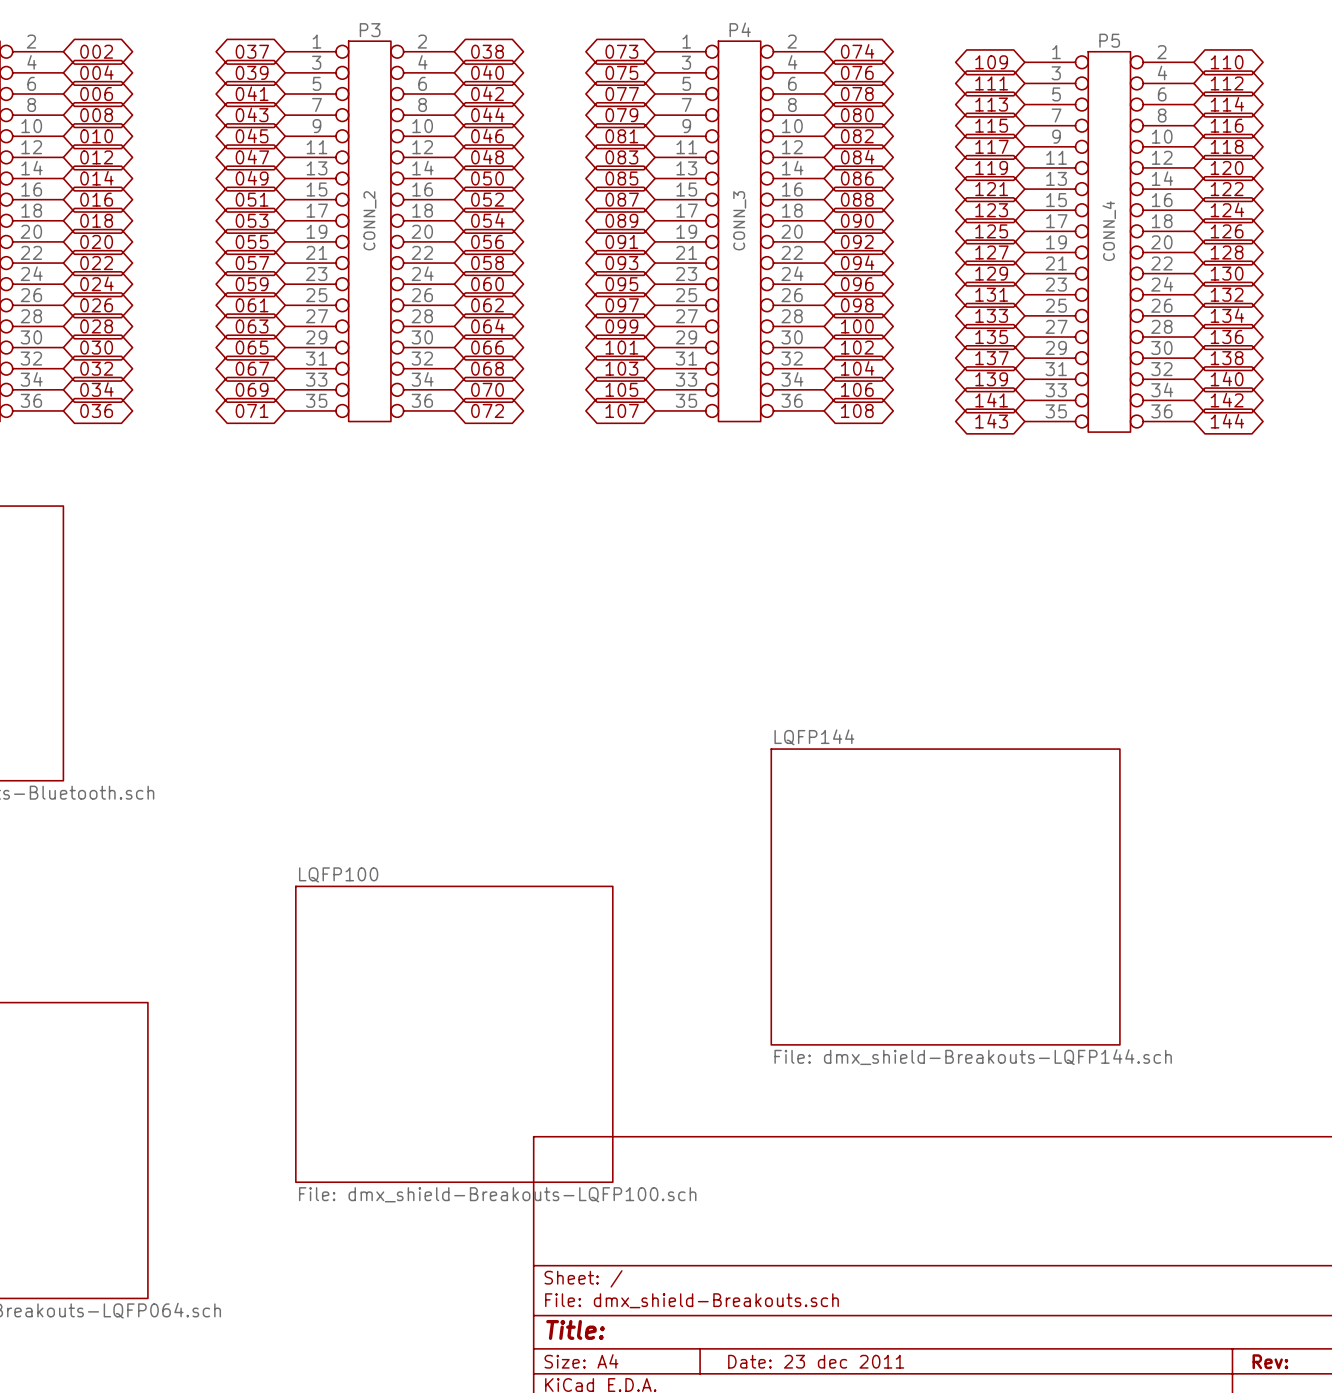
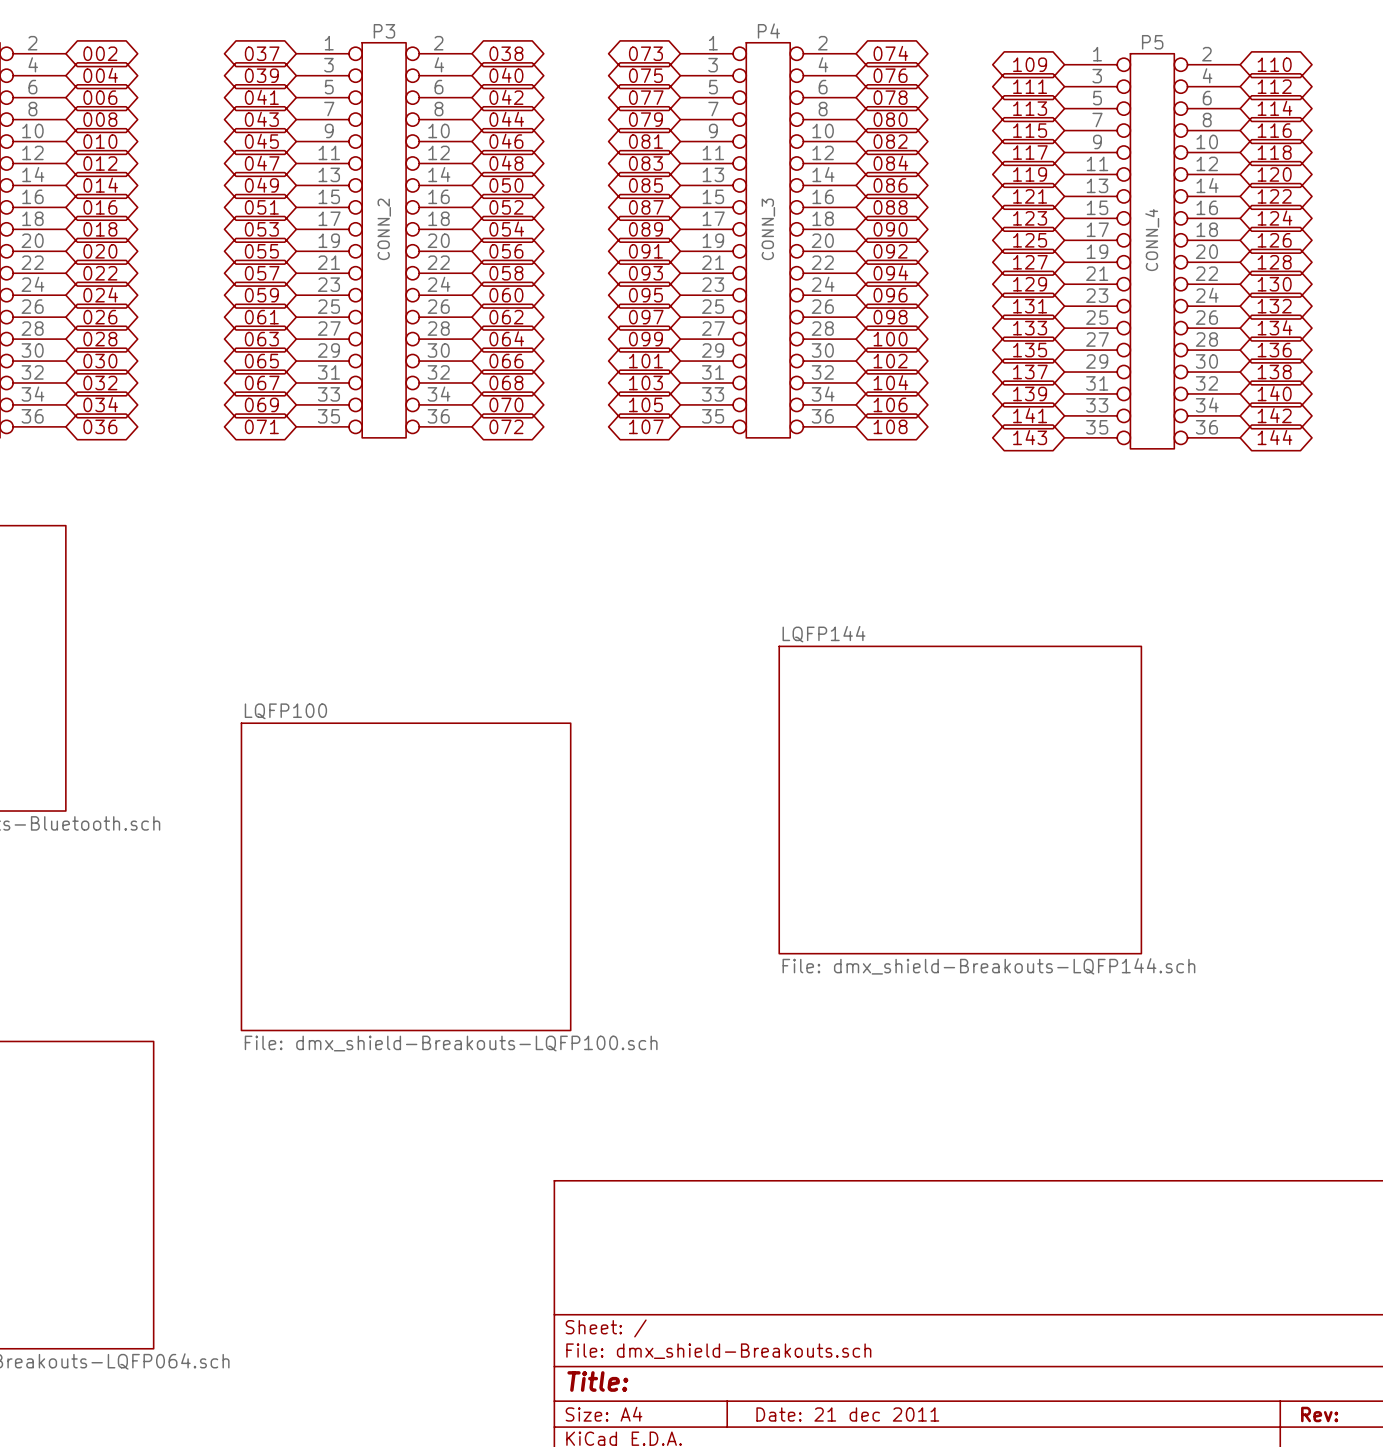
sheet LQFP144 position: (945, 896) -> (960, 800)
sheet LQFP100 position: (454, 1034) -> (406, 876)
title block: Date: 23 dec 2011 (816, 1361) -> Date: 21 dec 2011 (847, 1414)

